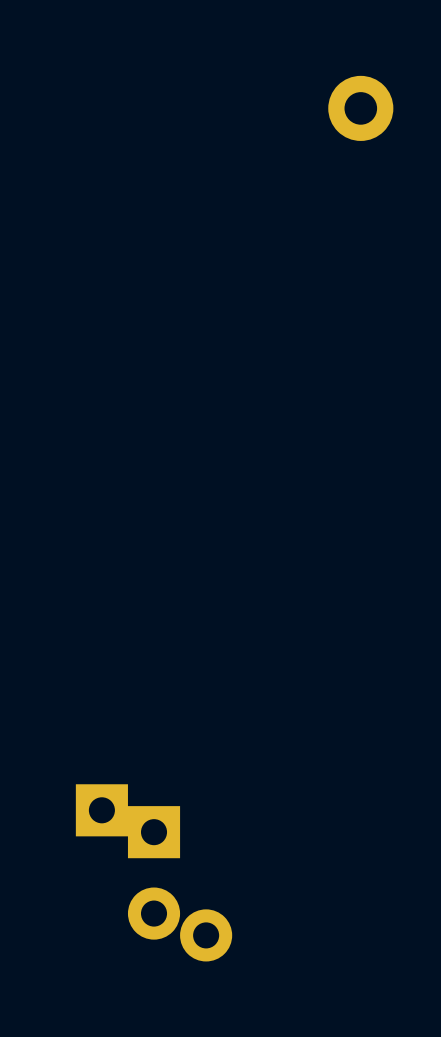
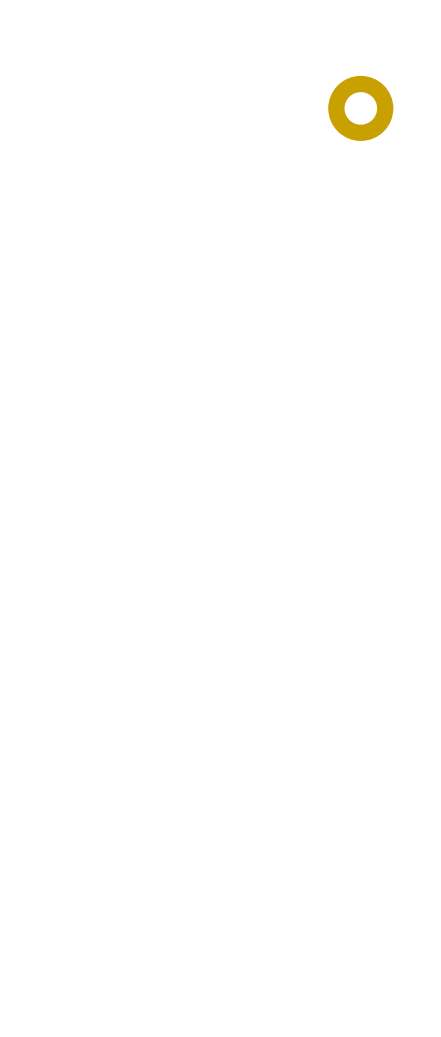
part: (154, 872) -> none

